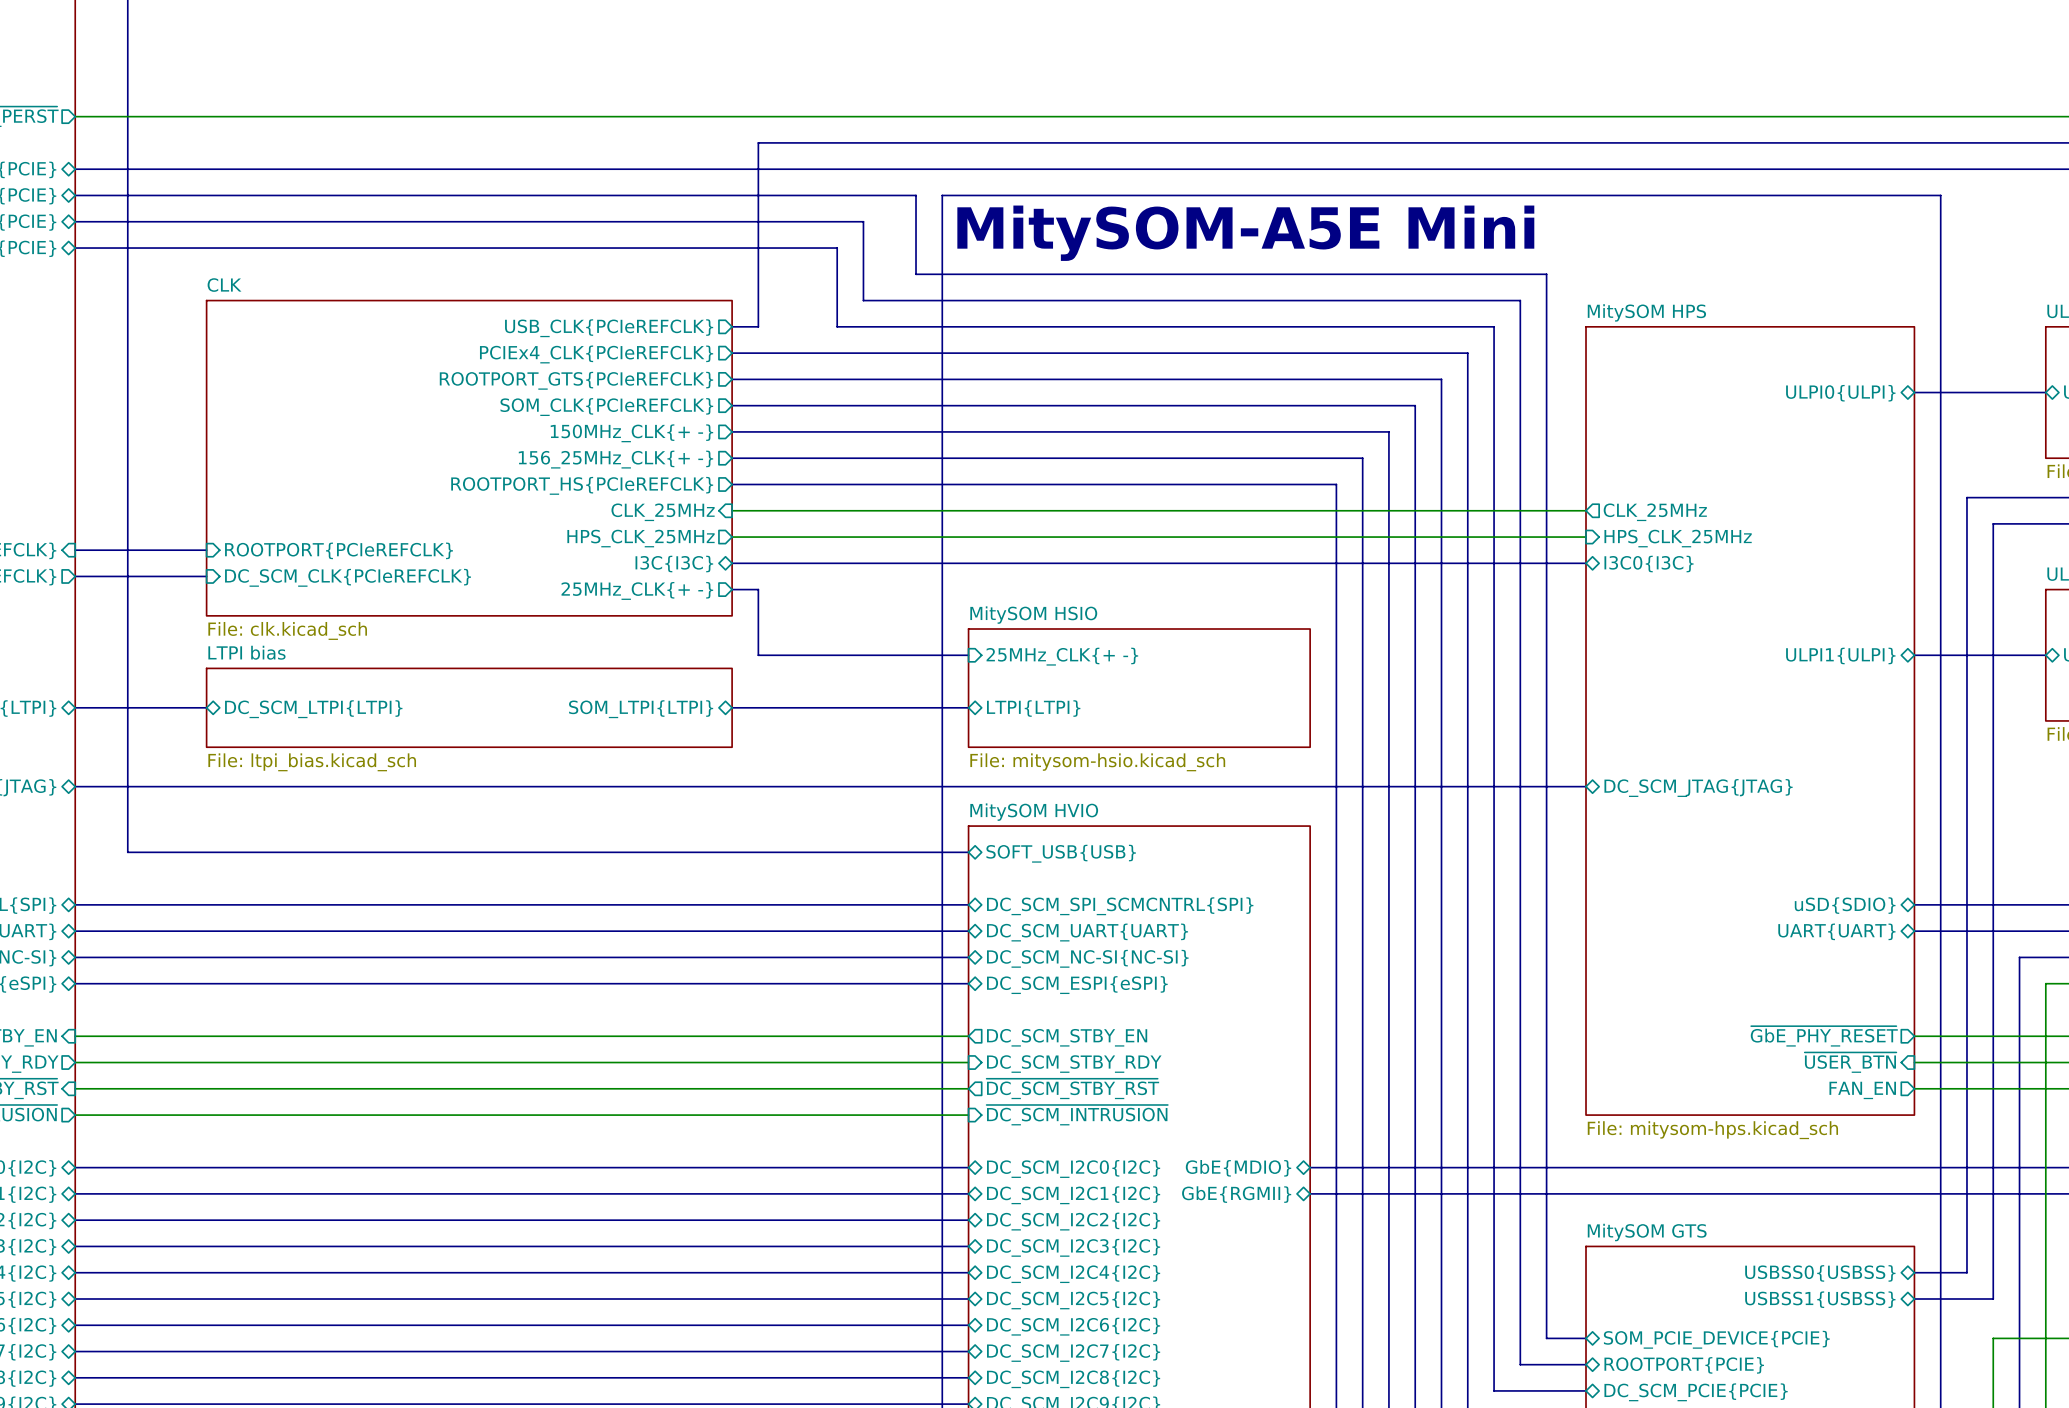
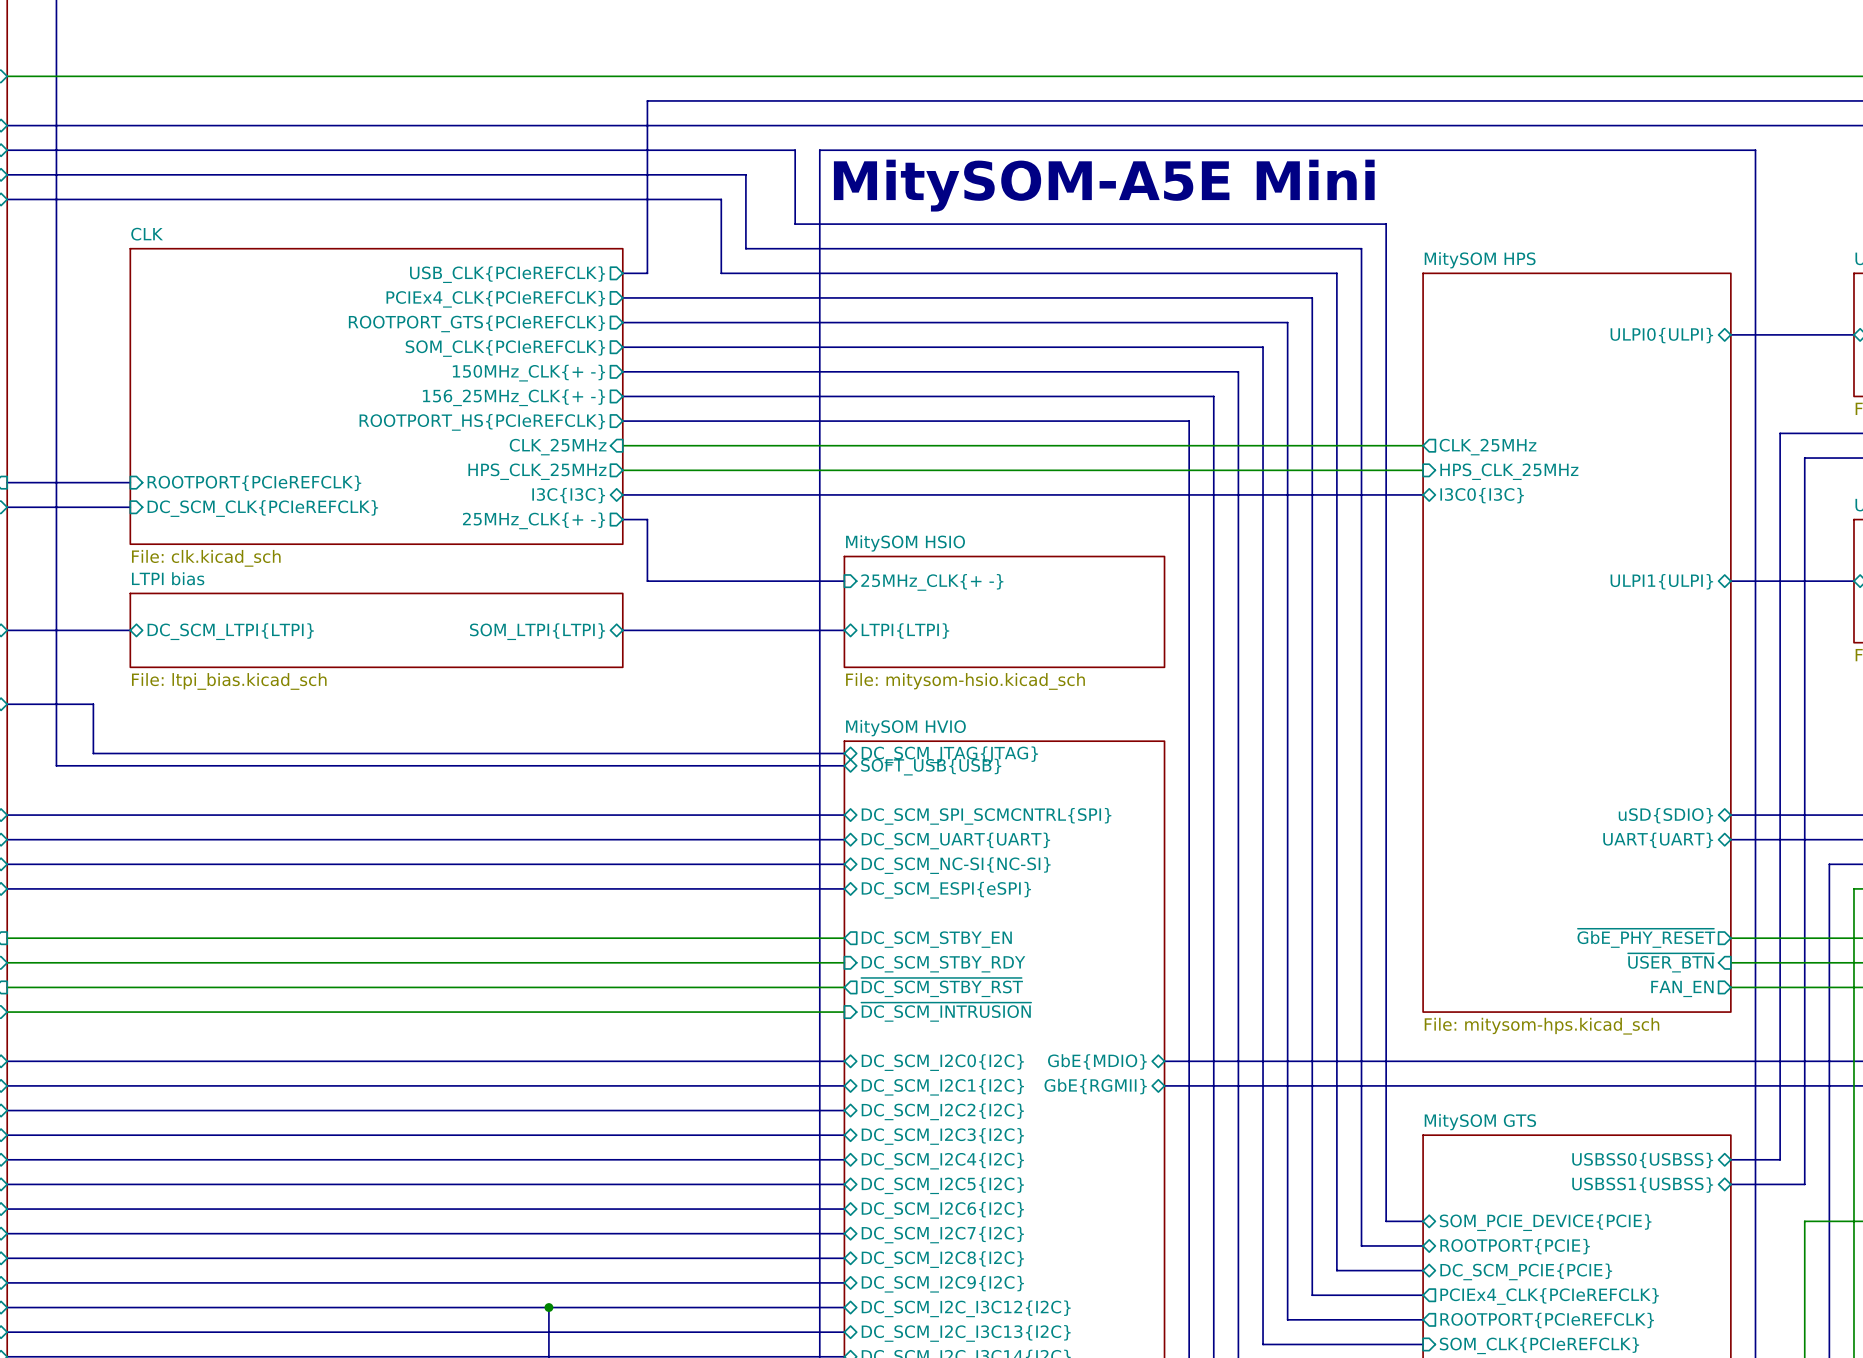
bus: (167, 786) (1586, 786) -> (93, 704) (93, 753) (844, 753)
sheet pin: DC_SCM_JTAG{JTAG} (1698, 788) -> none
sheet pin: none -> DC_SCM_JTAG{JTAG} (949, 754)

